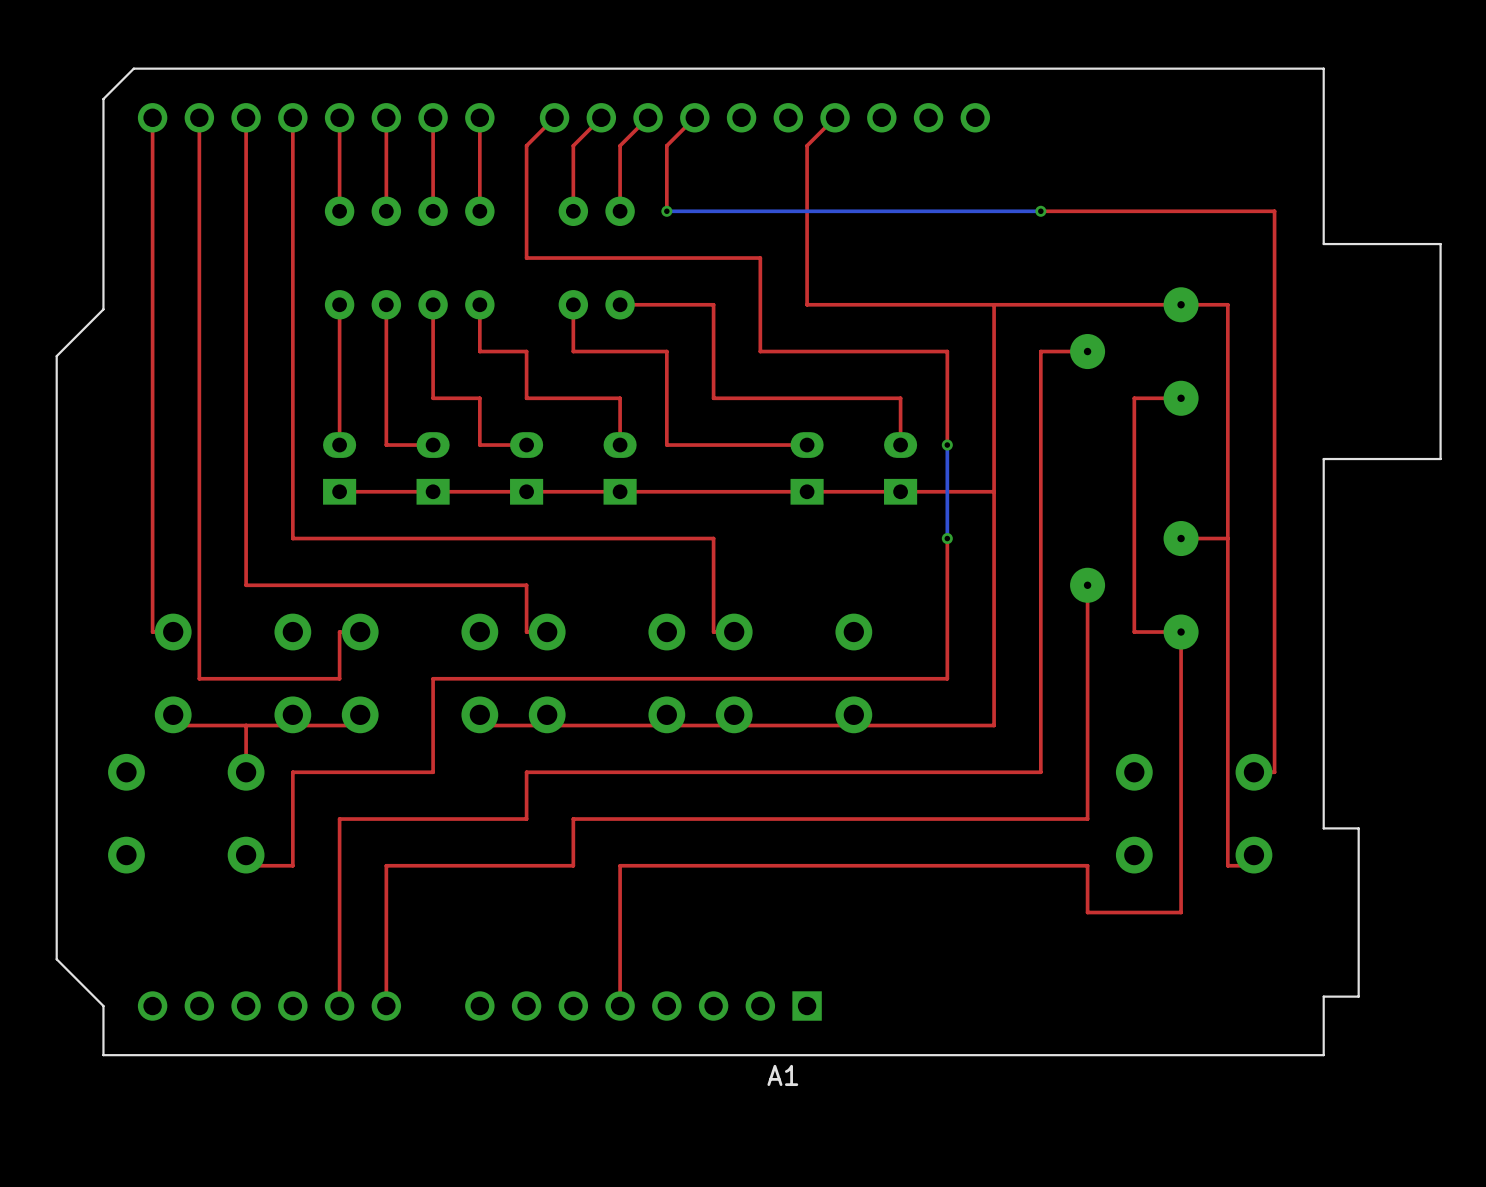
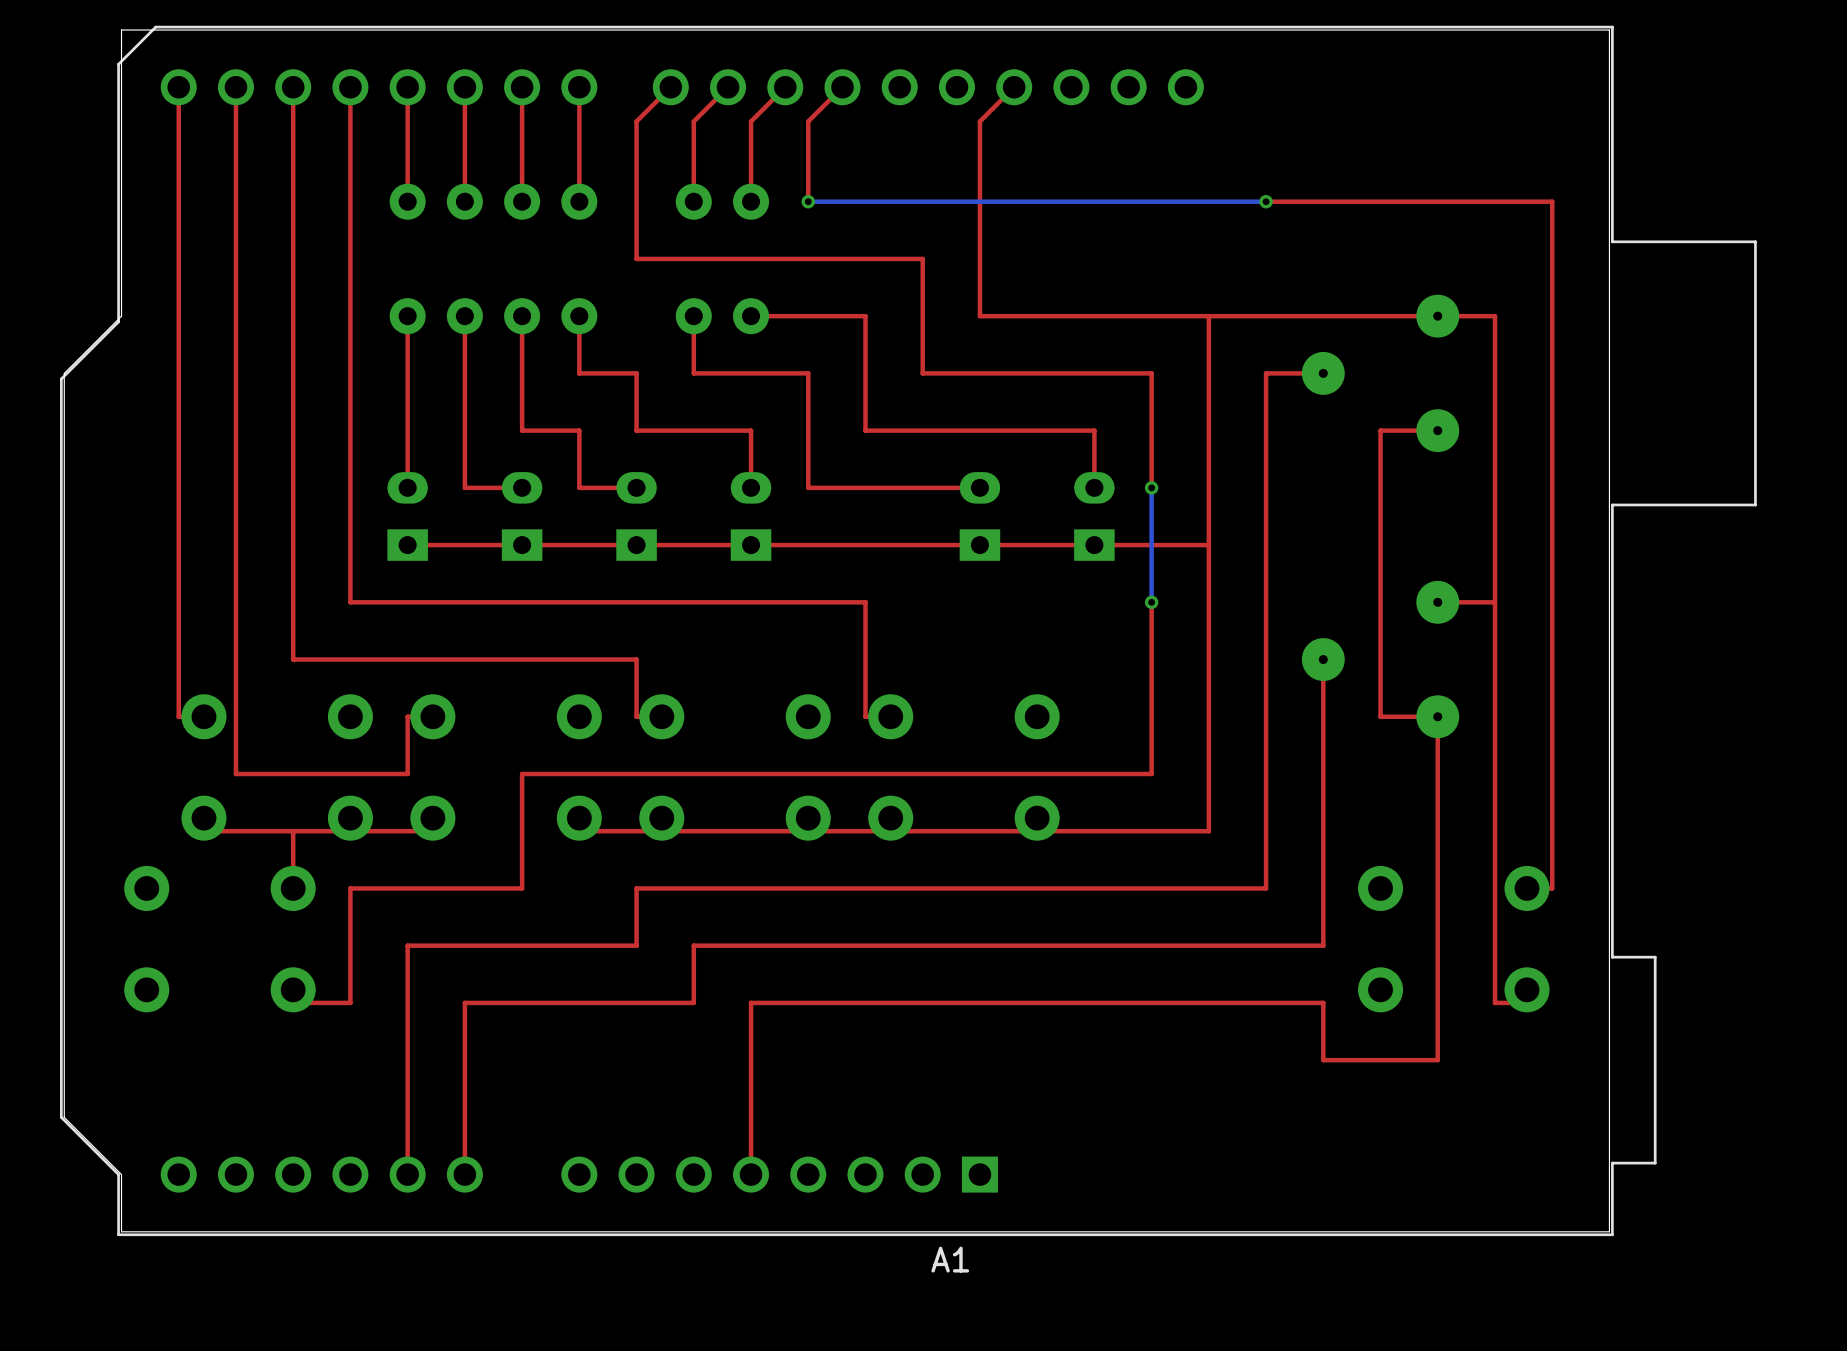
board edge: none -> (1609, 30) (1609, 1231) (121, 1231) (121, 1174) (64, 1117) (64, 373) (121, 316) (121, 30) (1609, 30)

